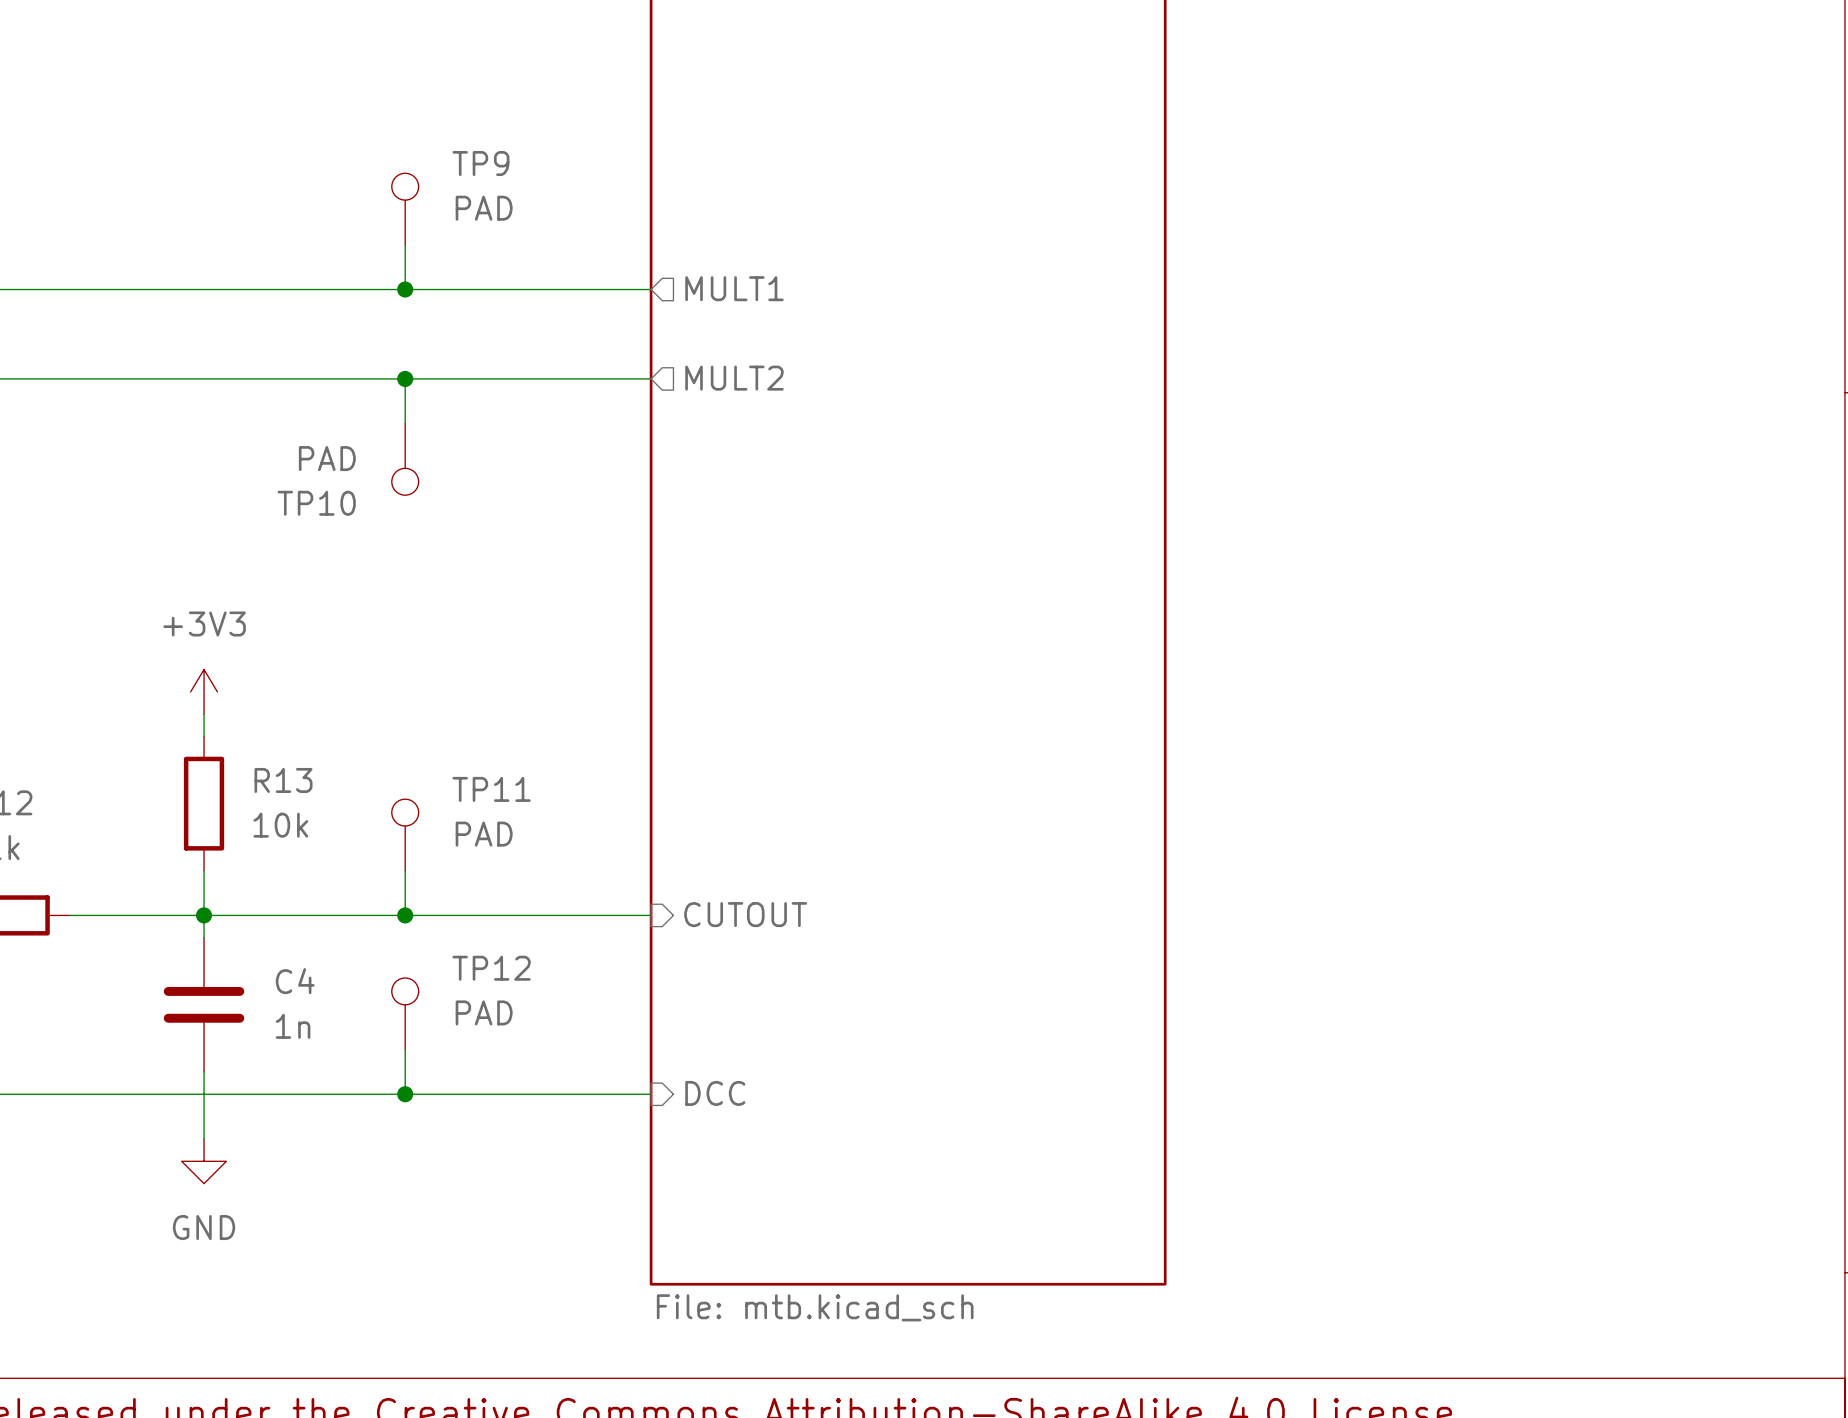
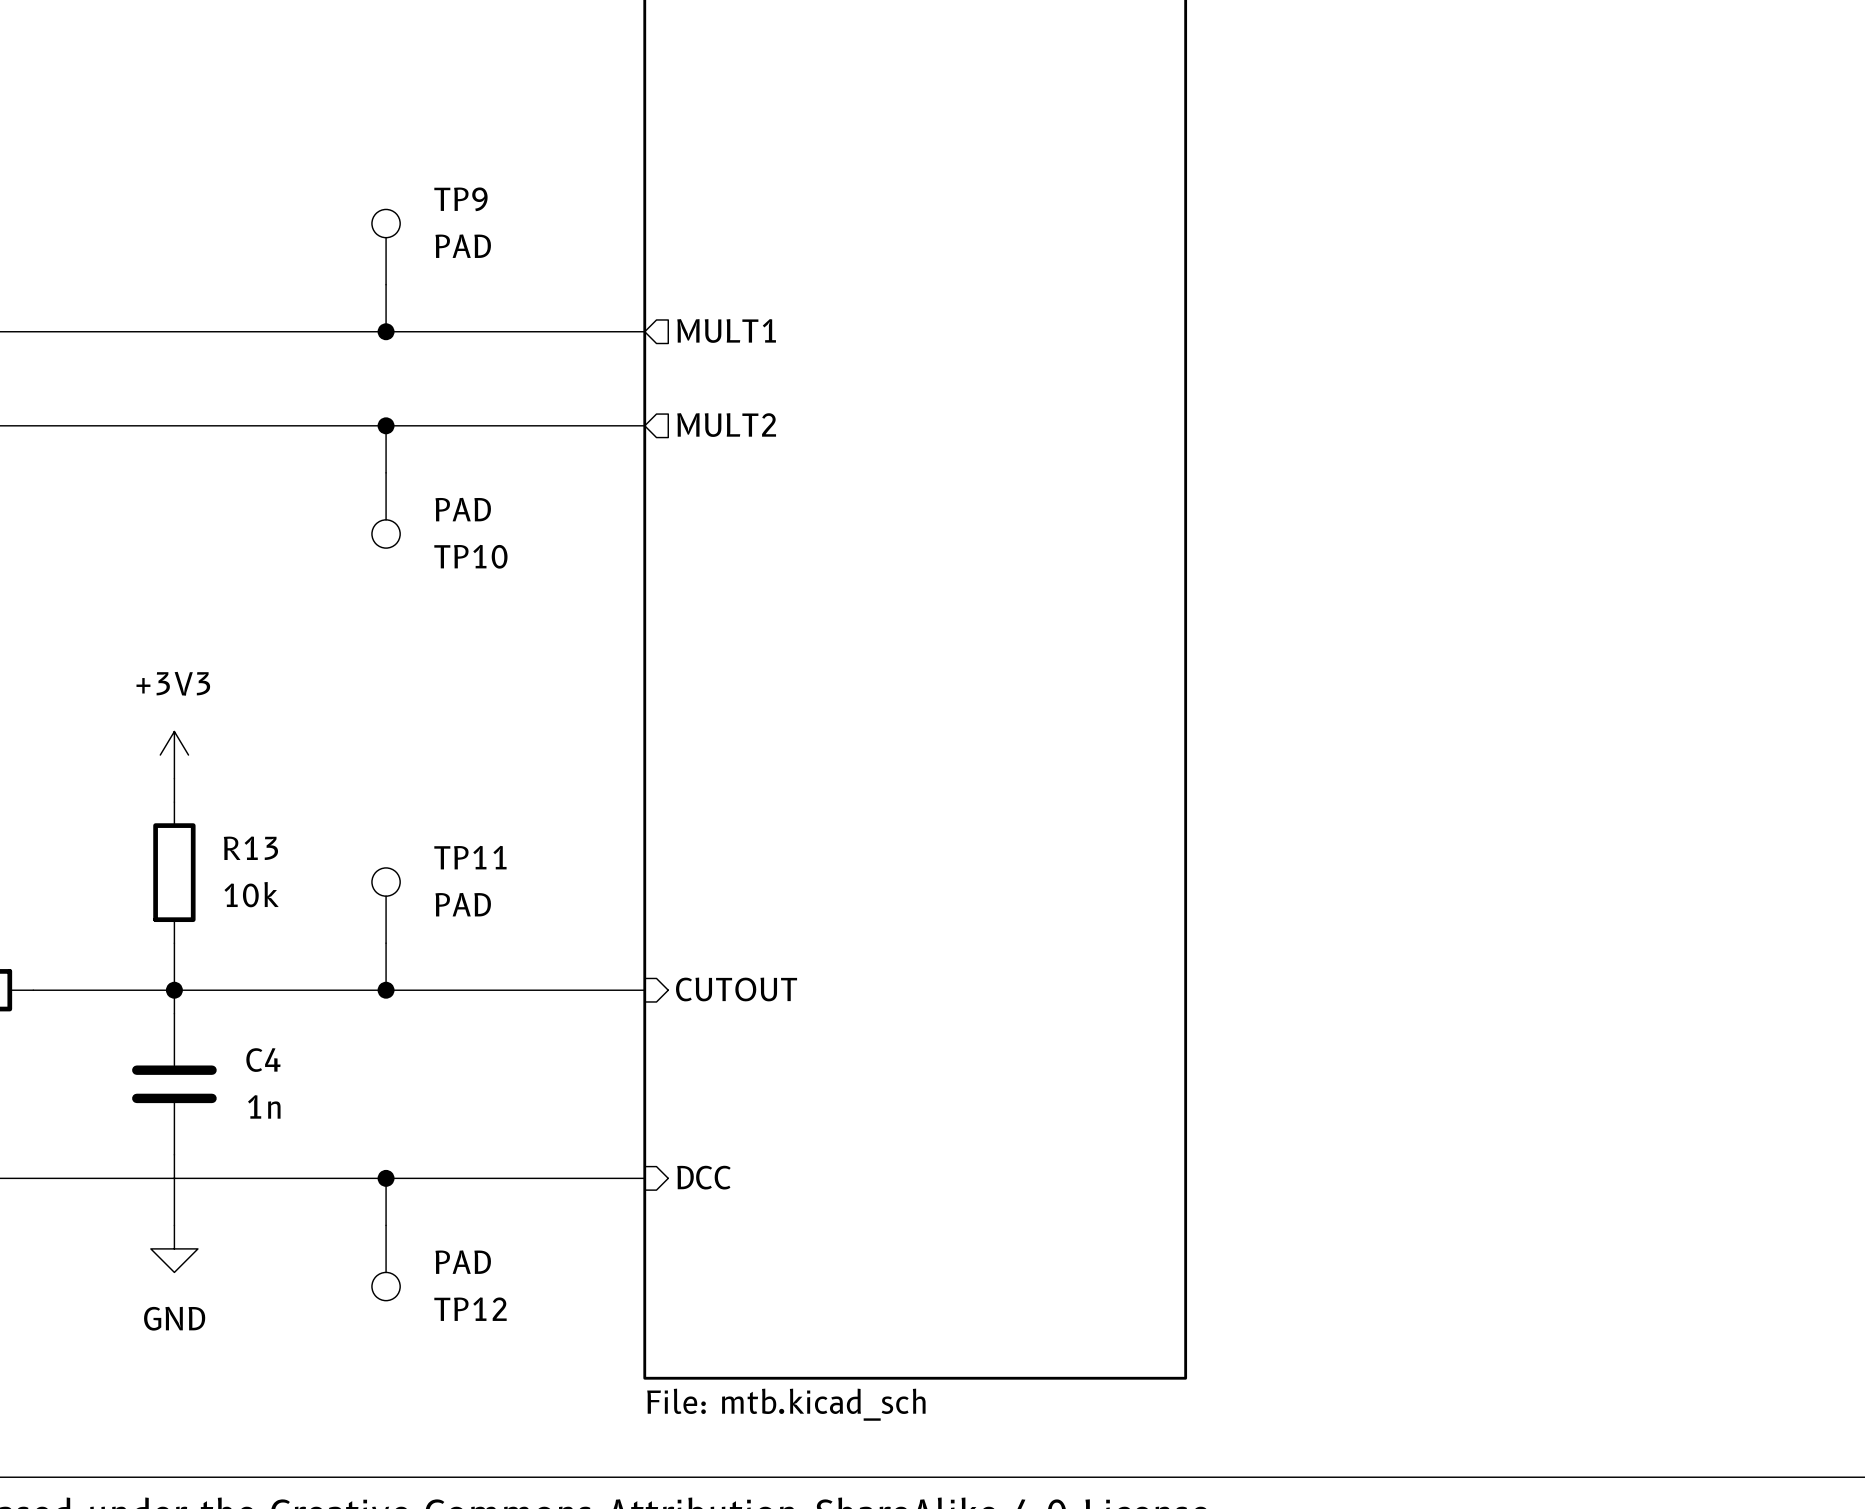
TP10 value position: PAD (327, 458) -> PAD (463, 509)
TP10 name position: TP10 (316, 503) -> TP10 (470, 556)
TP12 name position: TP12 (491, 968) -> TP12 (470, 1309)
TP12 rotation: 0° (405, 991) -> 180° (386, 1286)
TP12 position: (405, 1013) -> (386, 1263)
wire: (405, 1049) (405, 1094) -> (386, 1225) (386, 1178)

